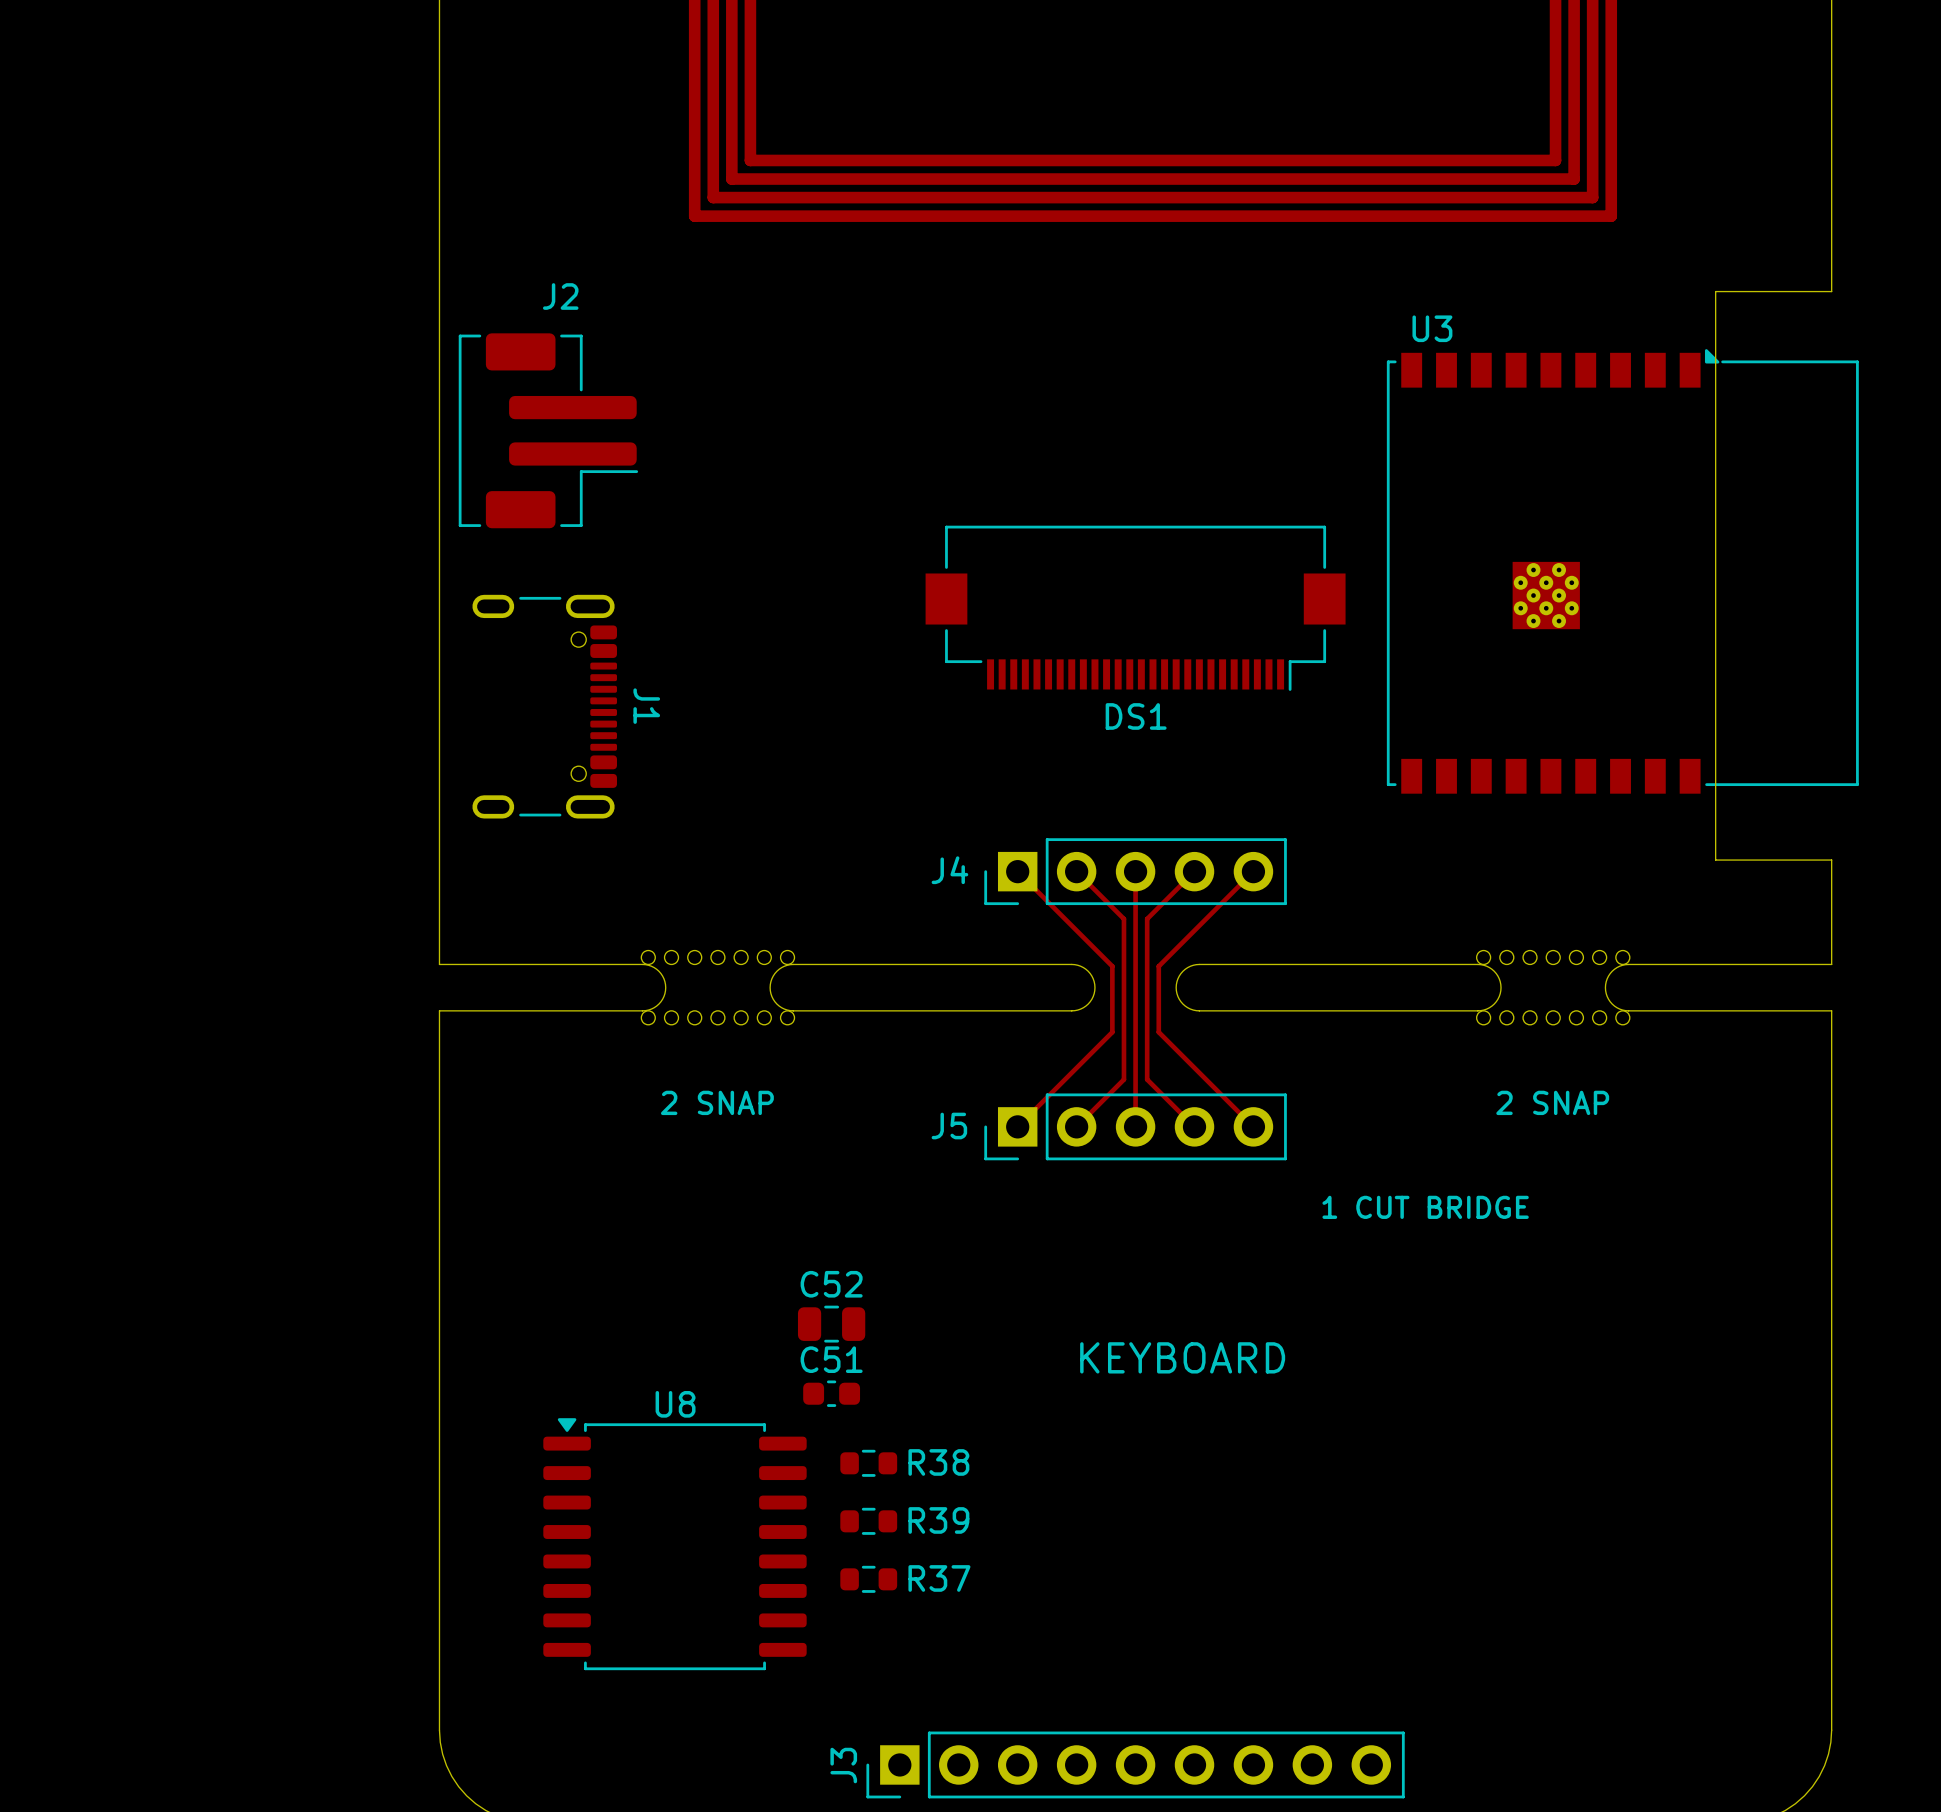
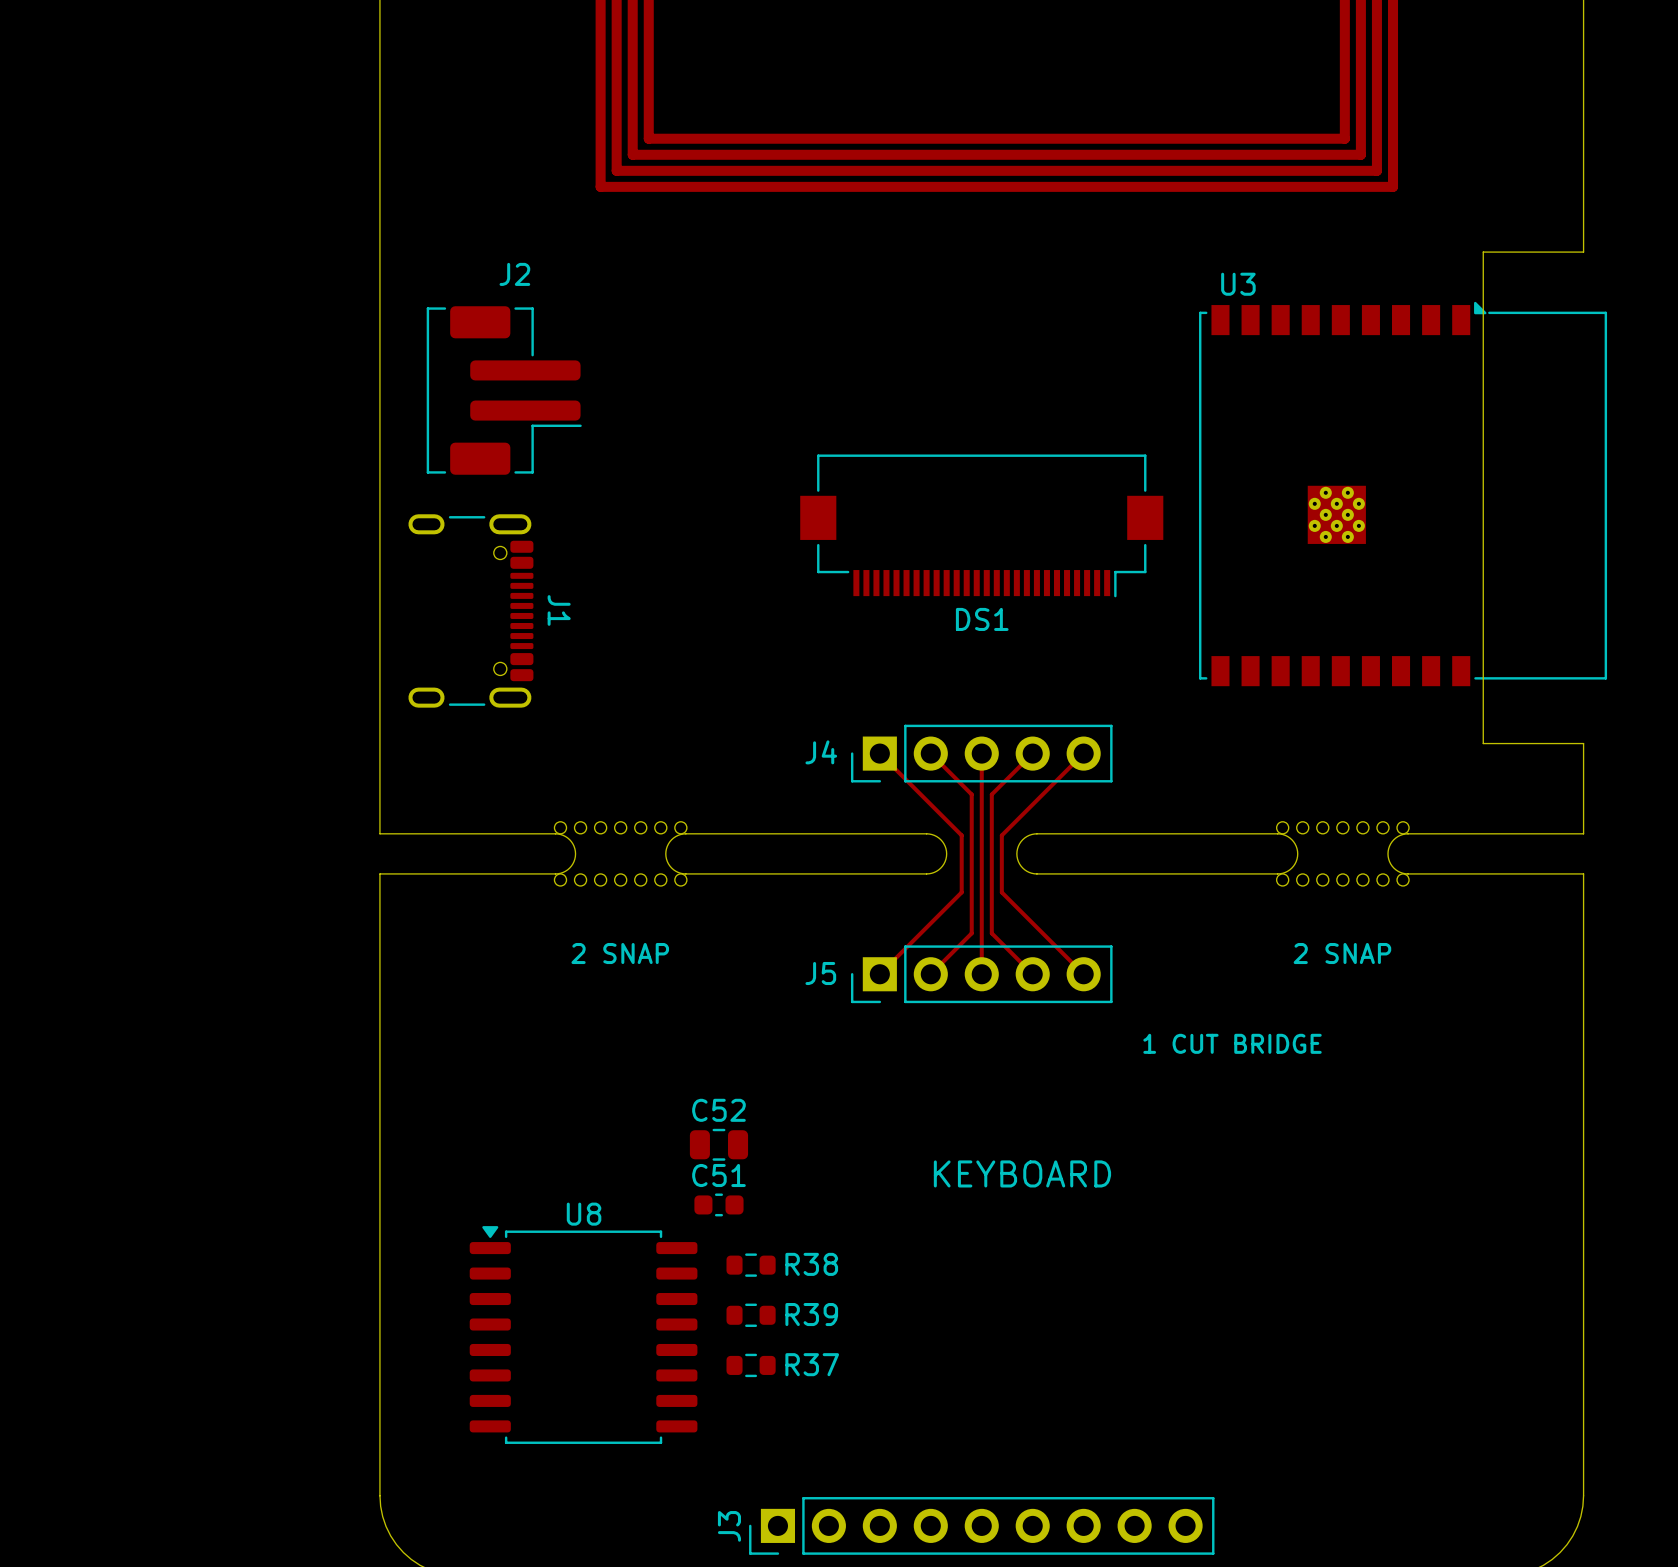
J2 position: (548, 430) -> (504, 390)

